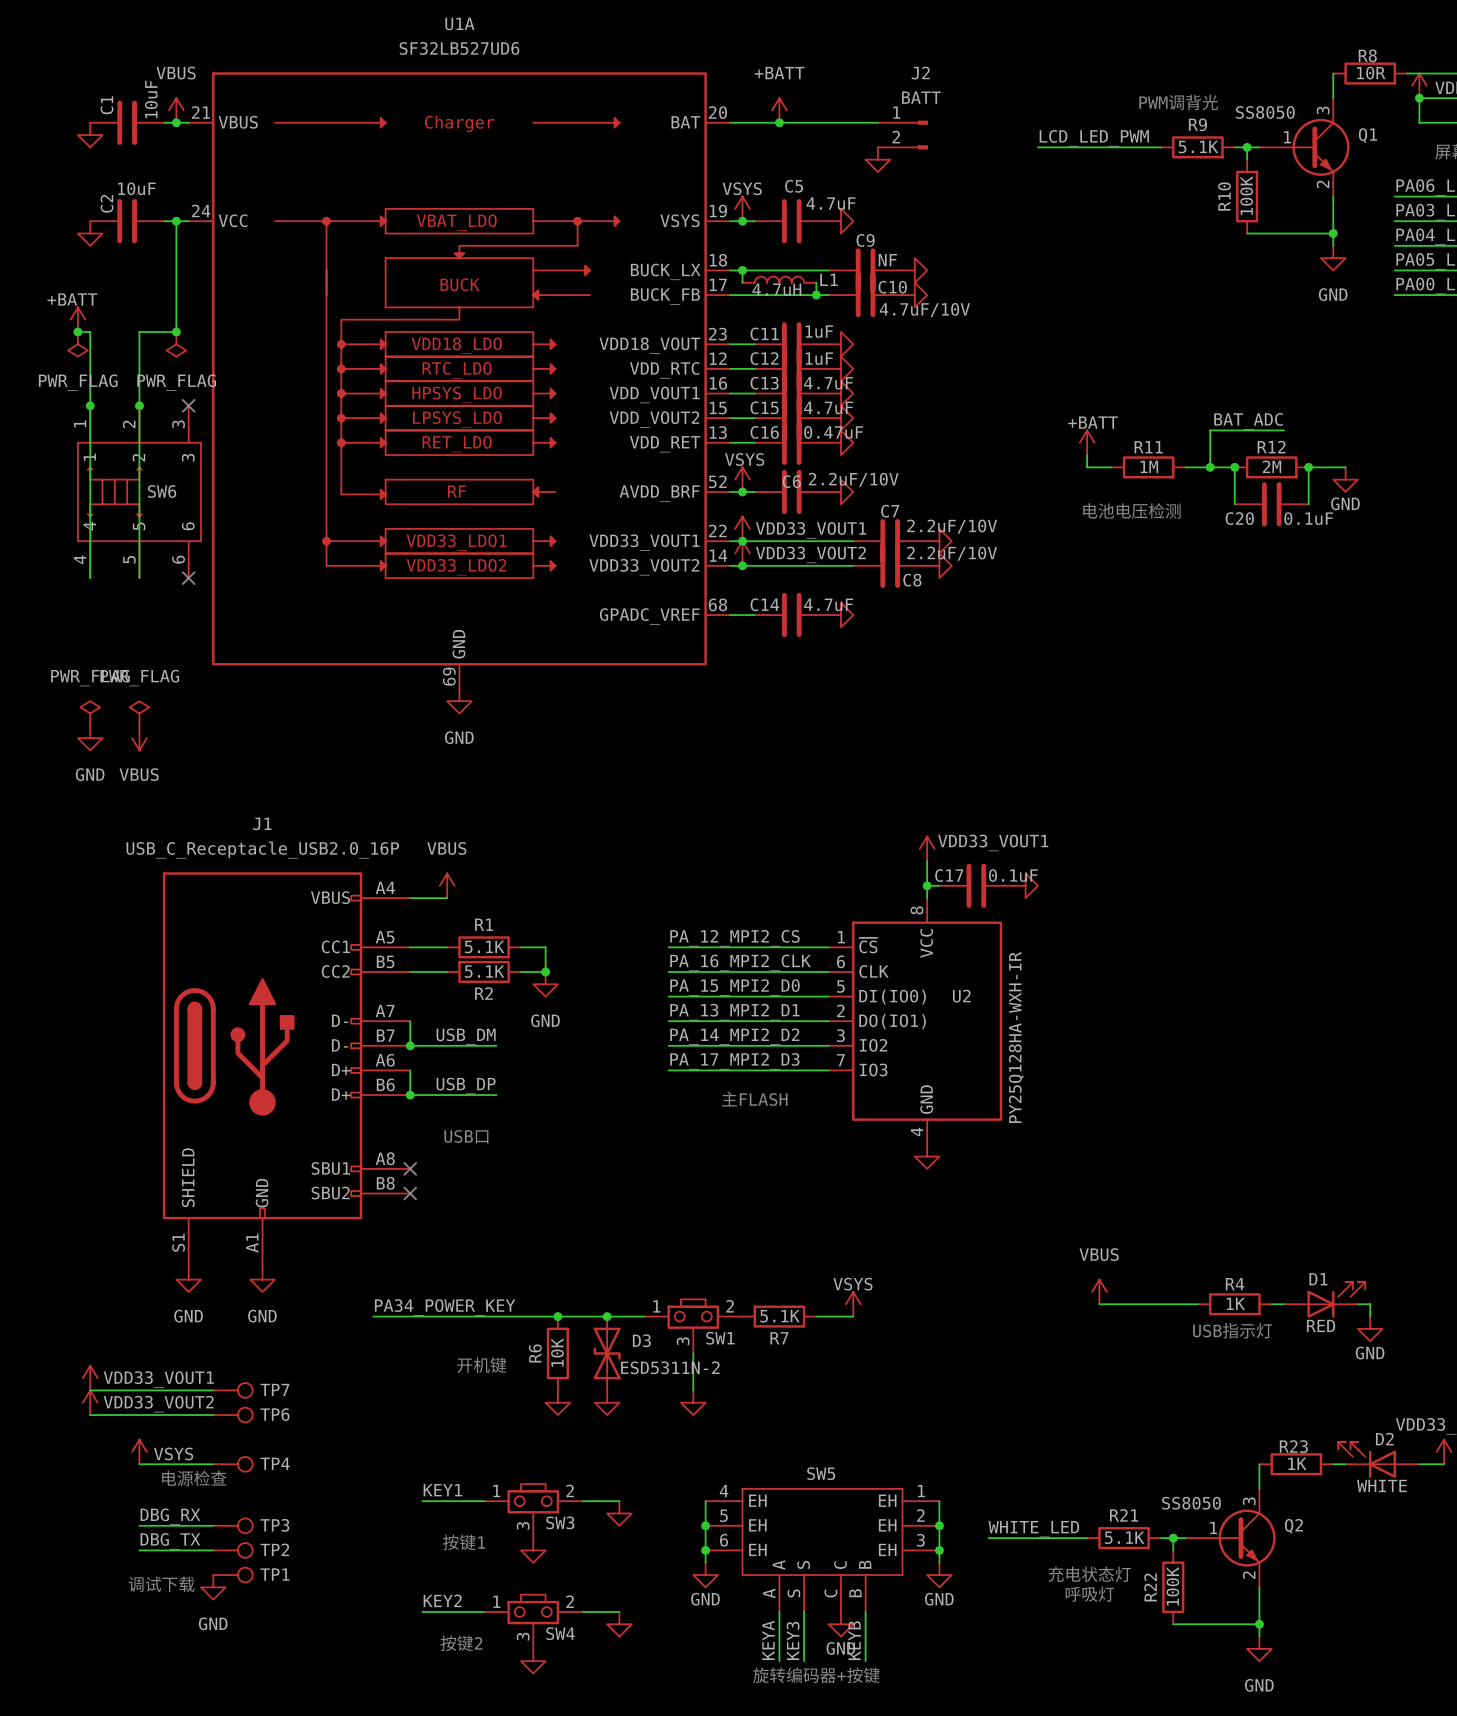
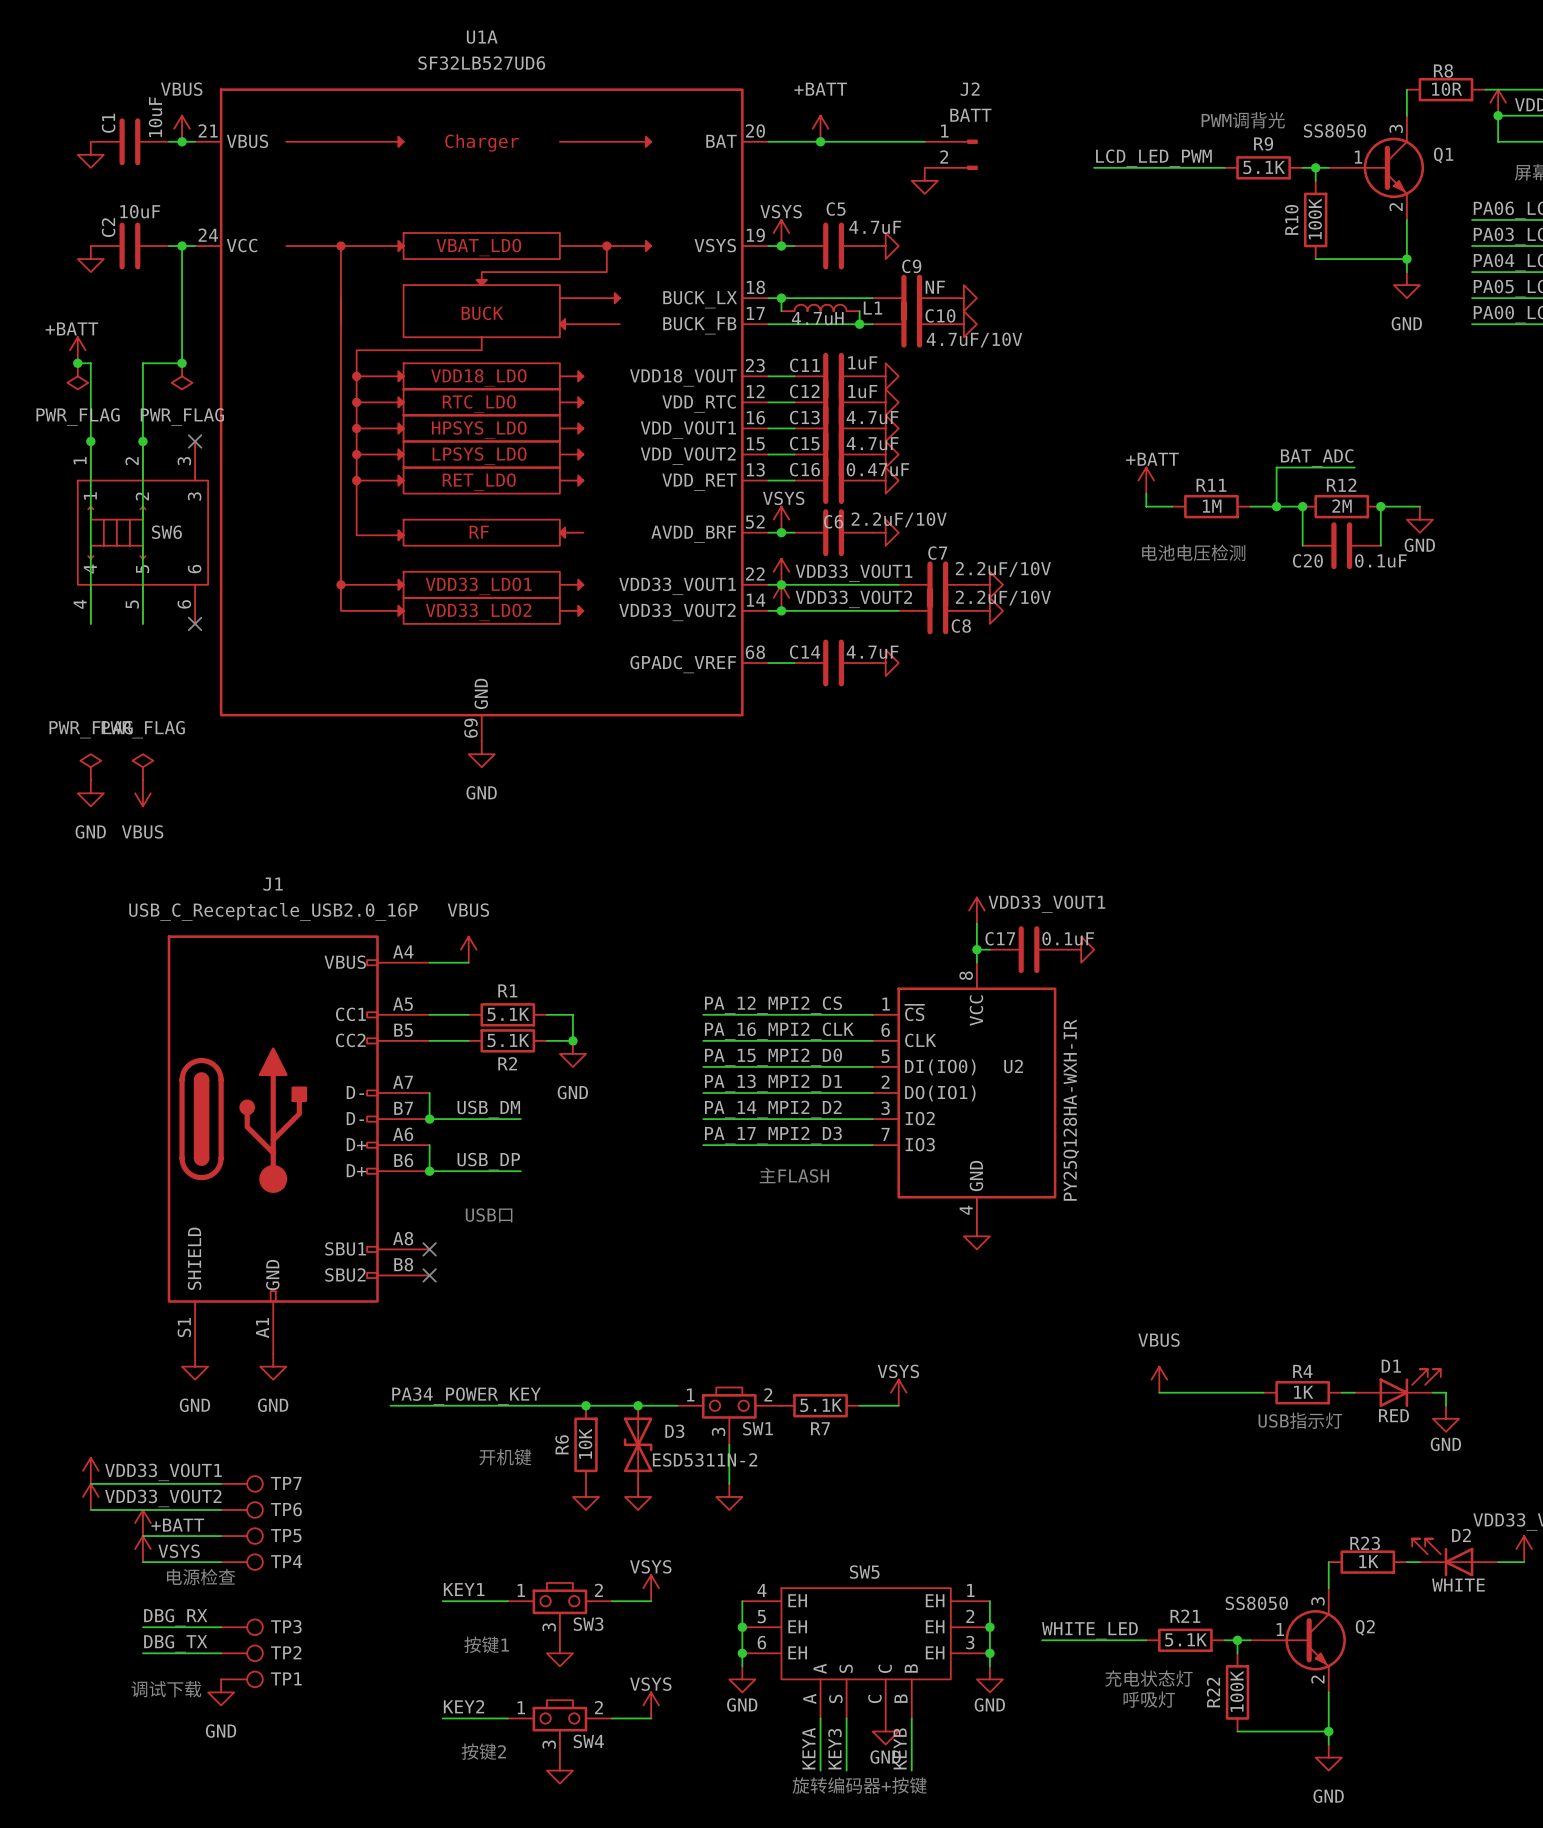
power symbol: none -> +BATT (142, 1523)
wire: none -> (142, 1536) (221, 1536)
TP5: none -> (241, 1536)
power symbol: none -> VSYS (651, 1588)
power symbol: (619, 1513) -> none
power symbol: none -> VSYS (651, 1705)
power symbol: (619, 1624) -> none

